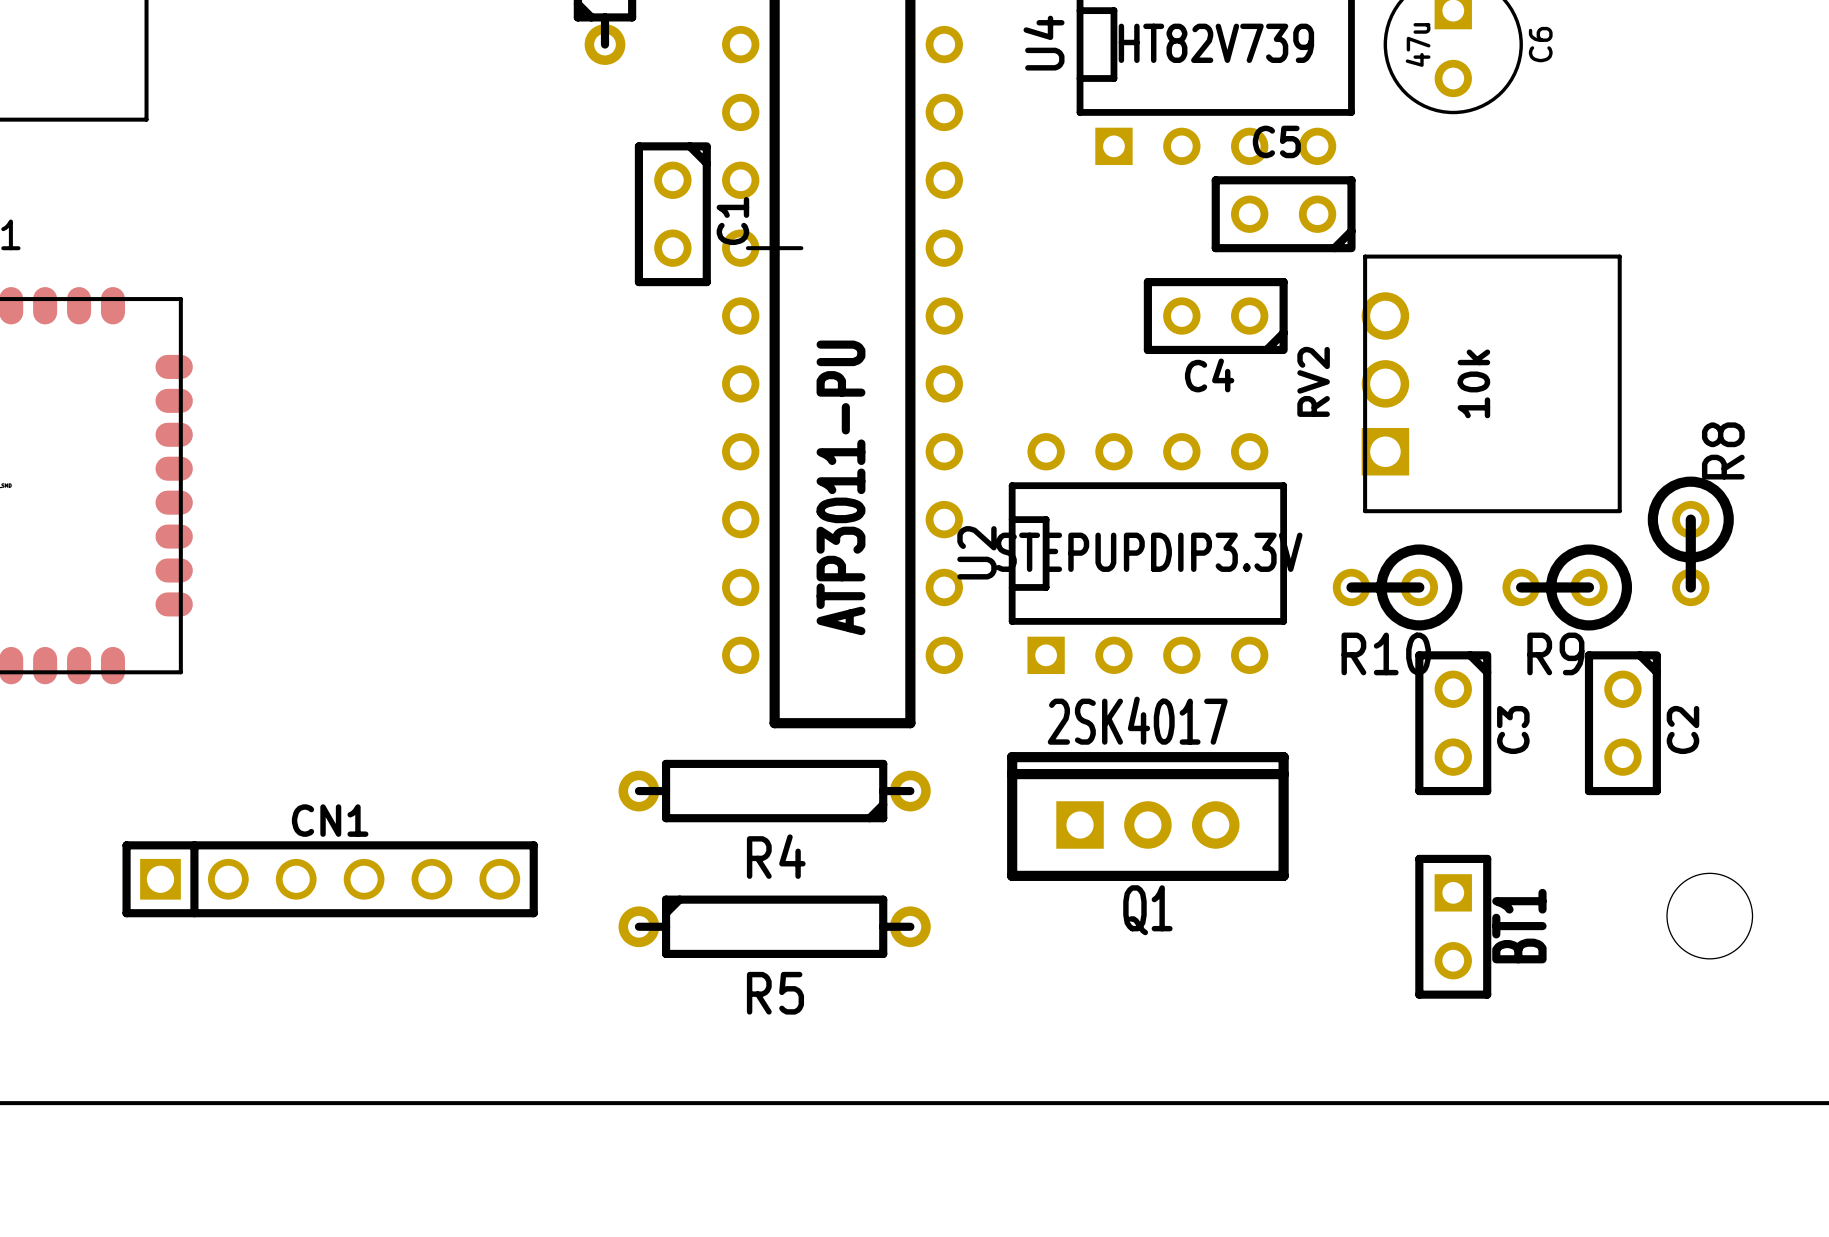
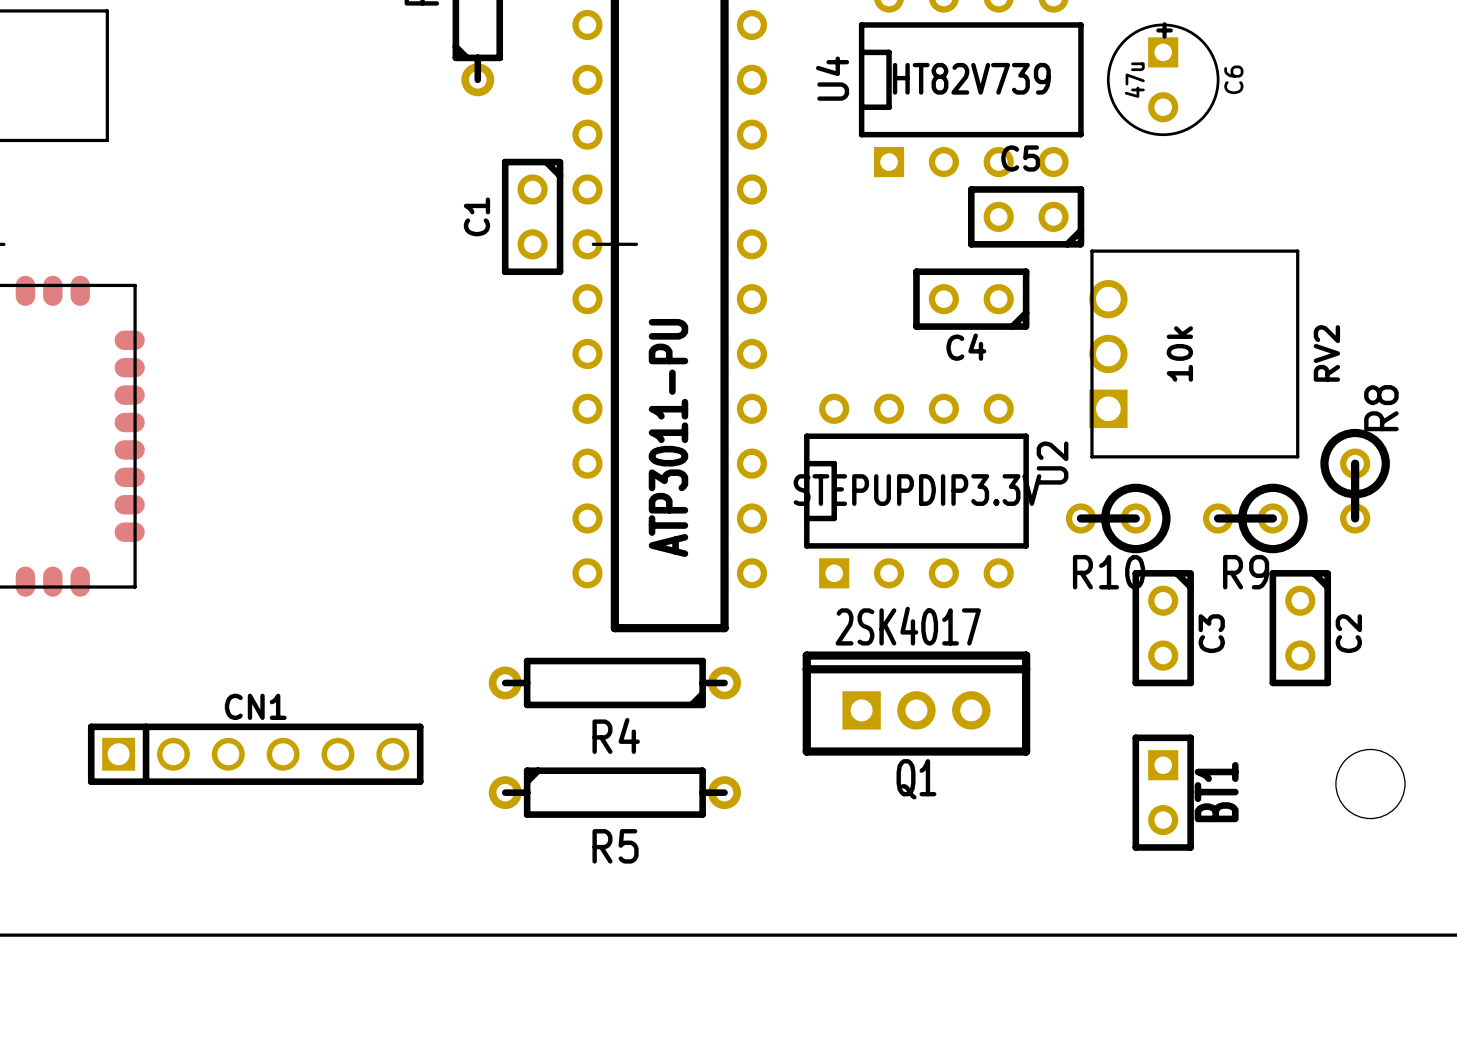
C1 name position: C1 (732, 221) -> C1 (476, 216)
RV2 name position: RV2 (1313, 381) -> RV2 (1326, 353)
U2 name position: U2 (976, 552) -> U2 (1052, 463)

